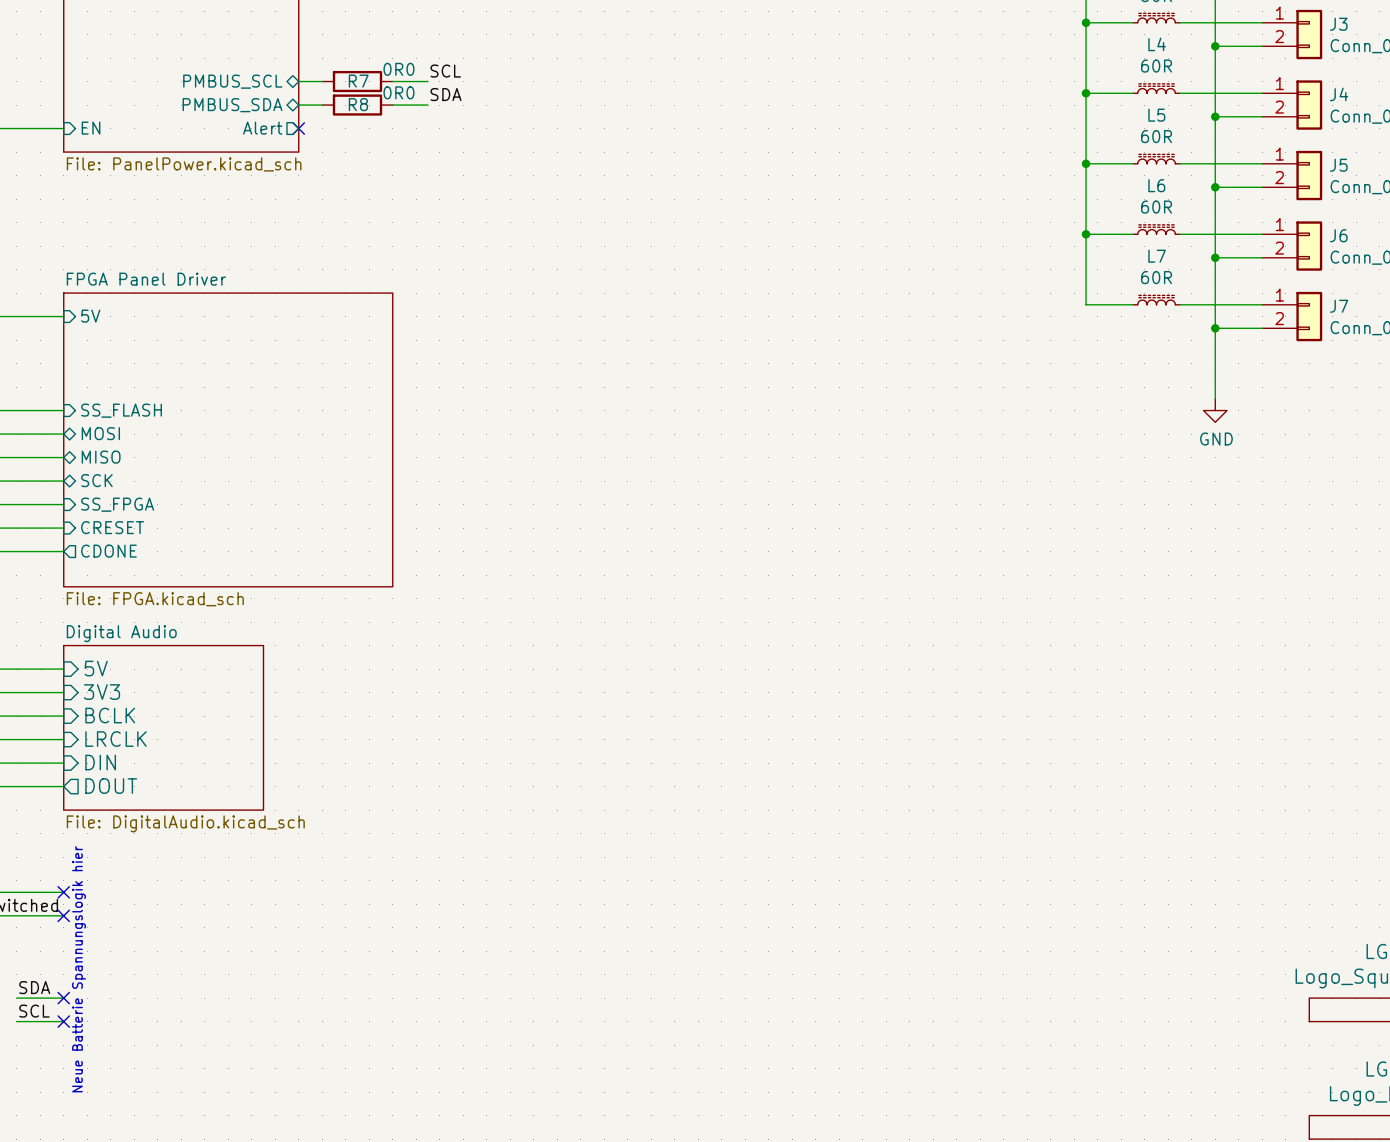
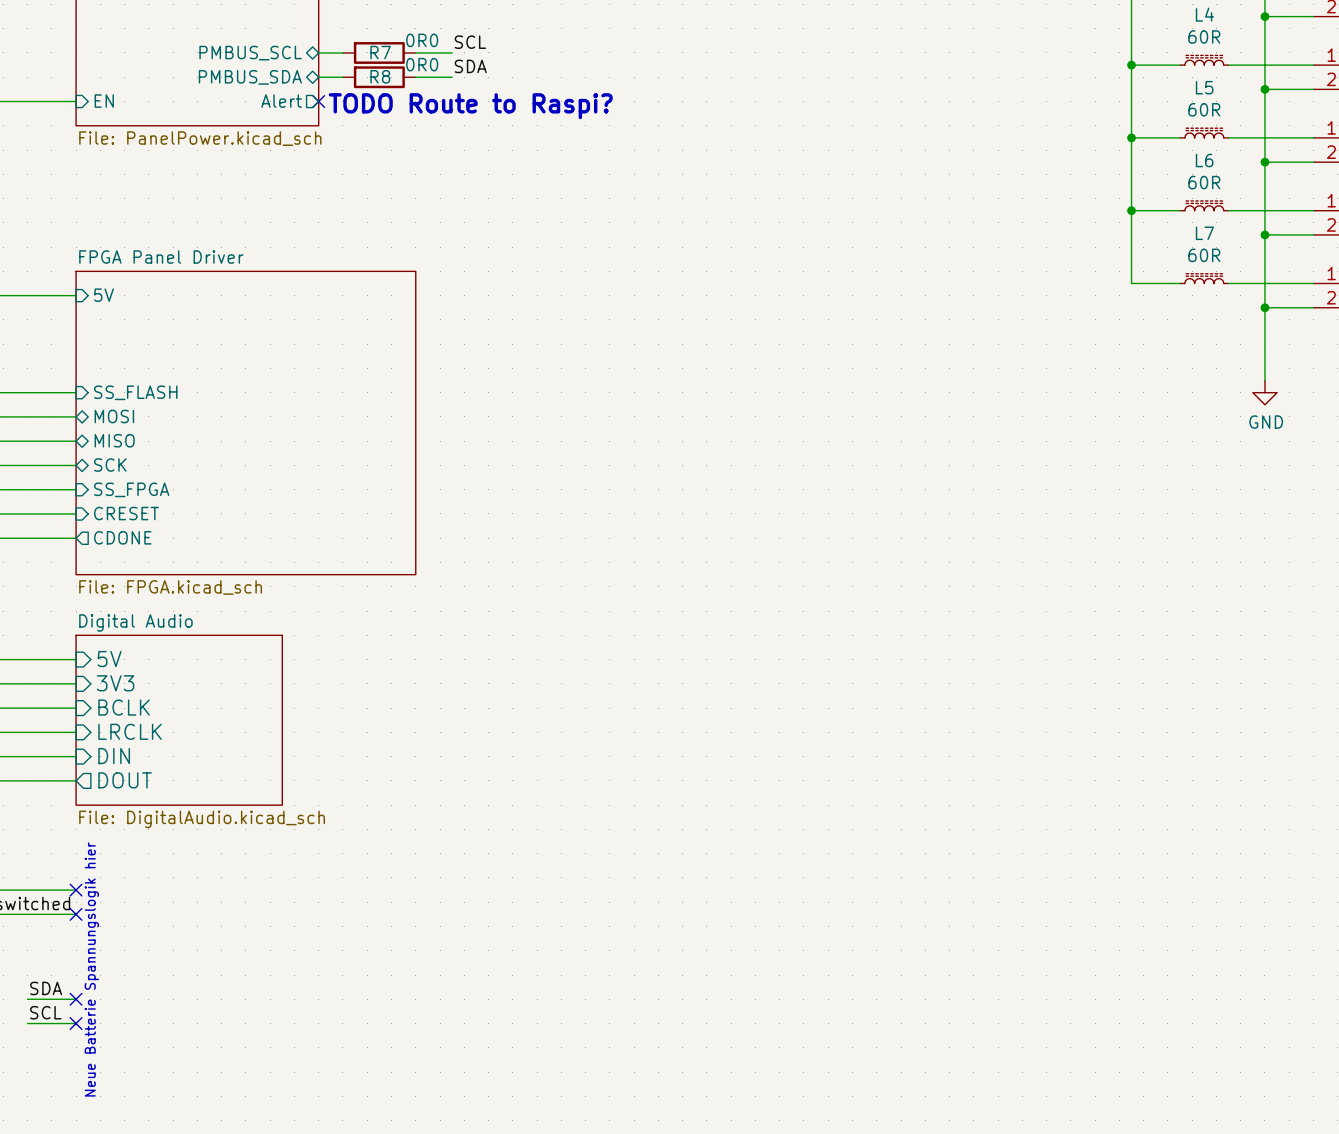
text: none -> TODO Route to Raspi? (470, 106)

